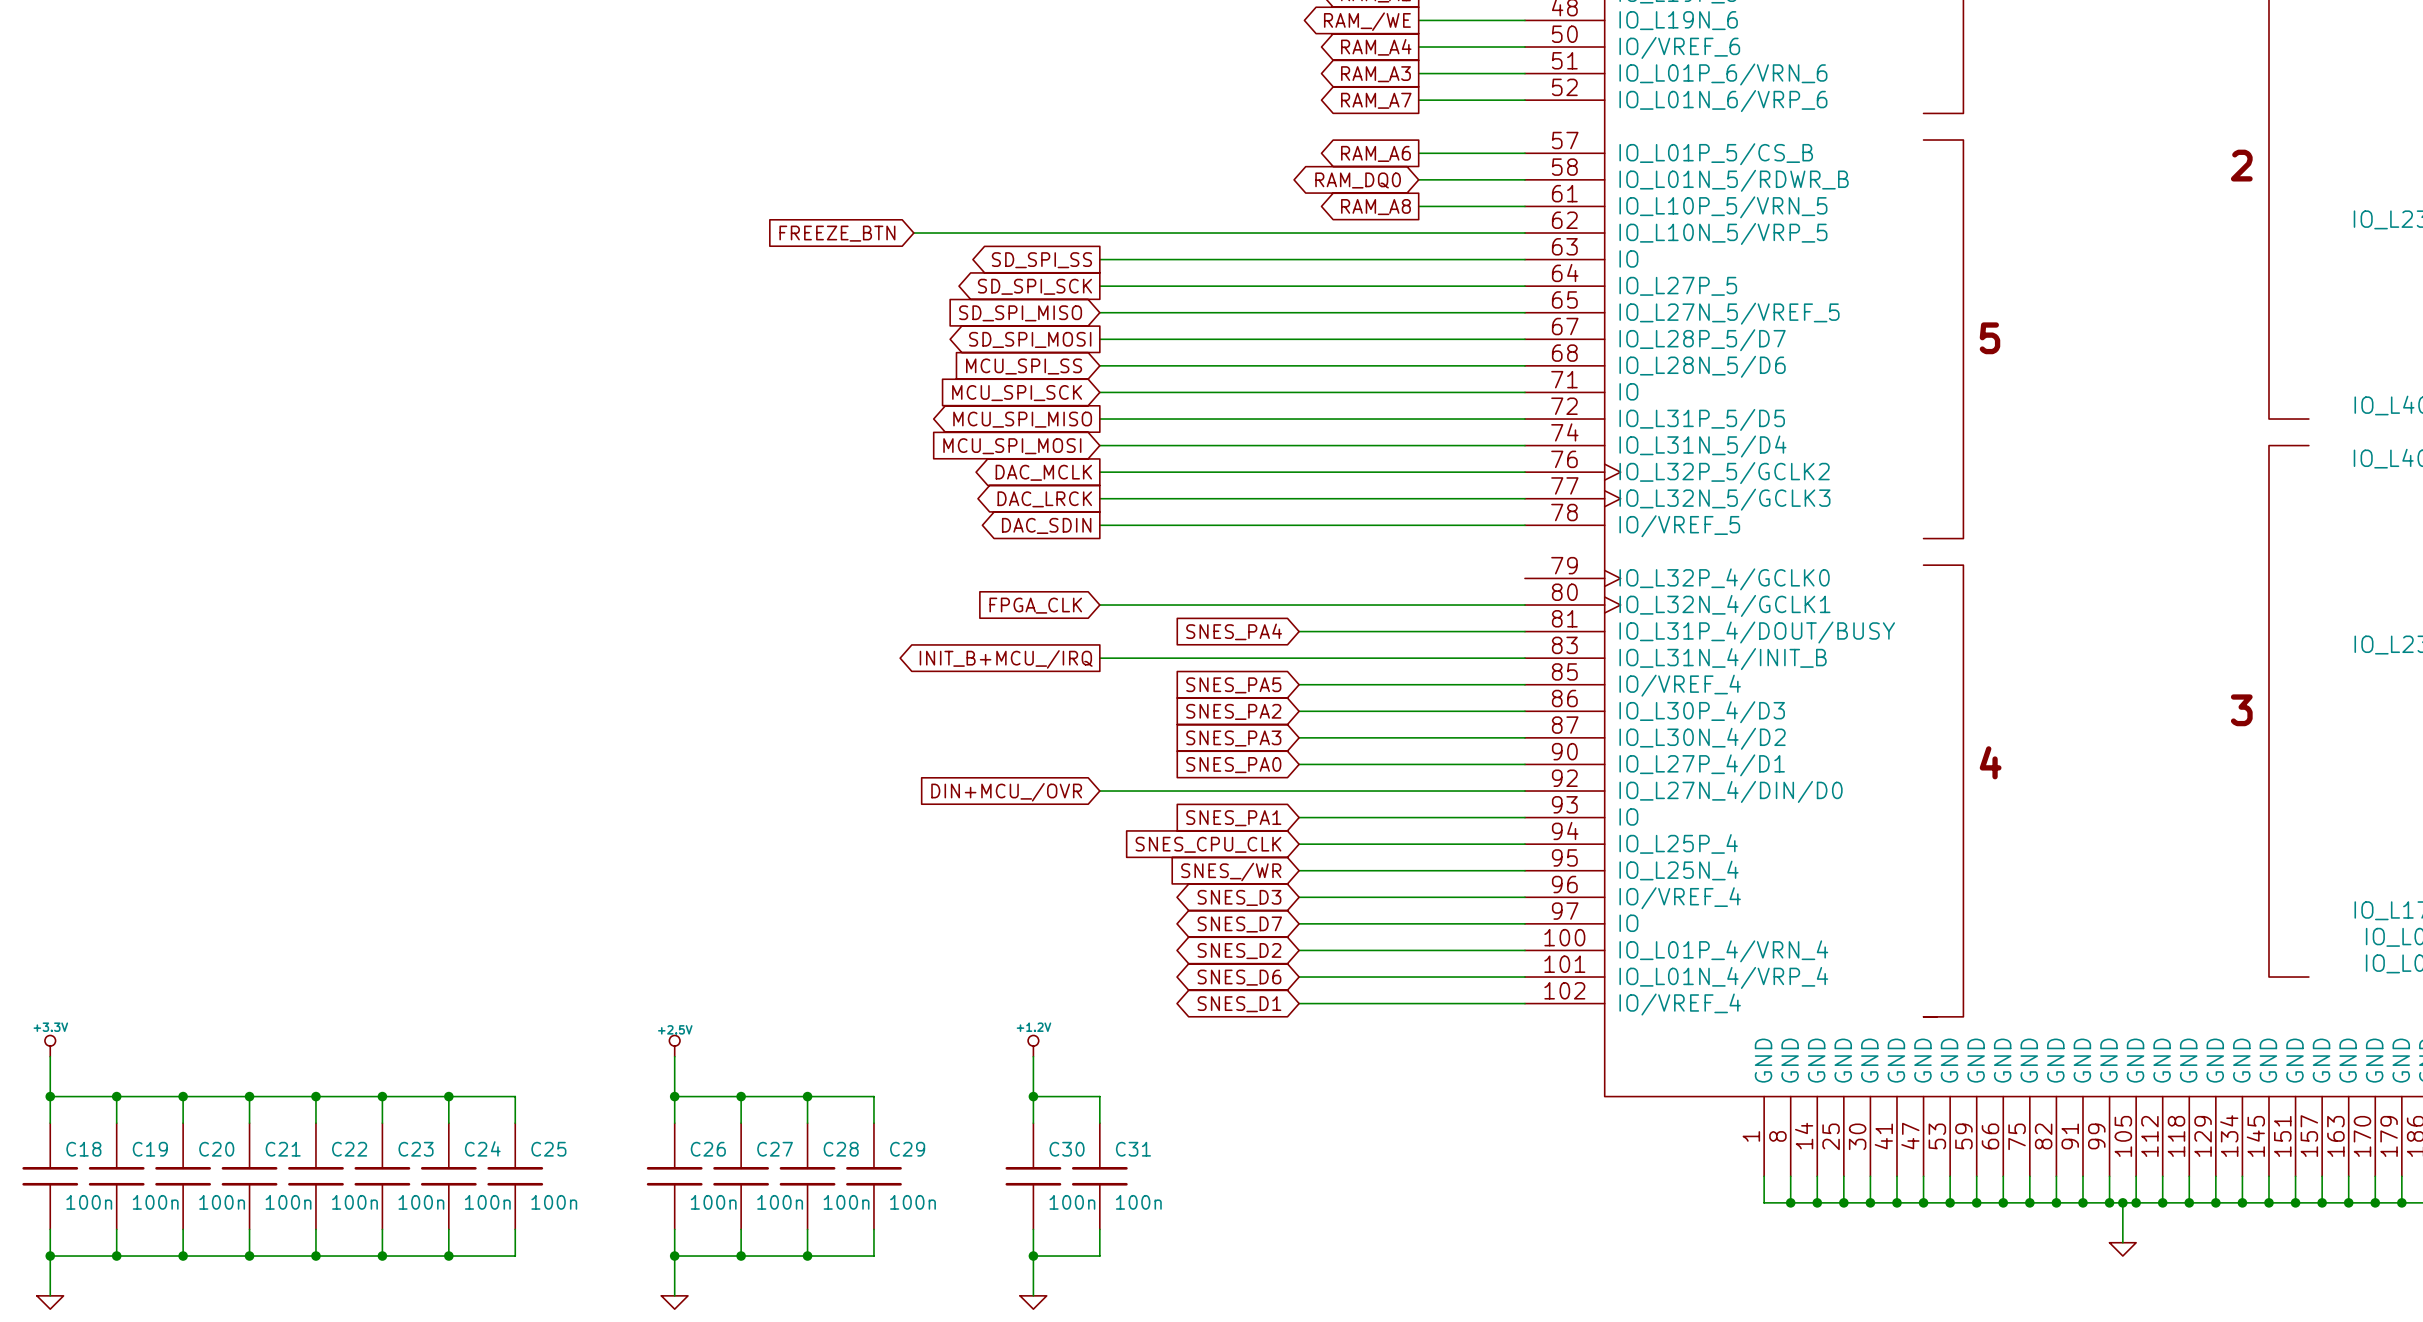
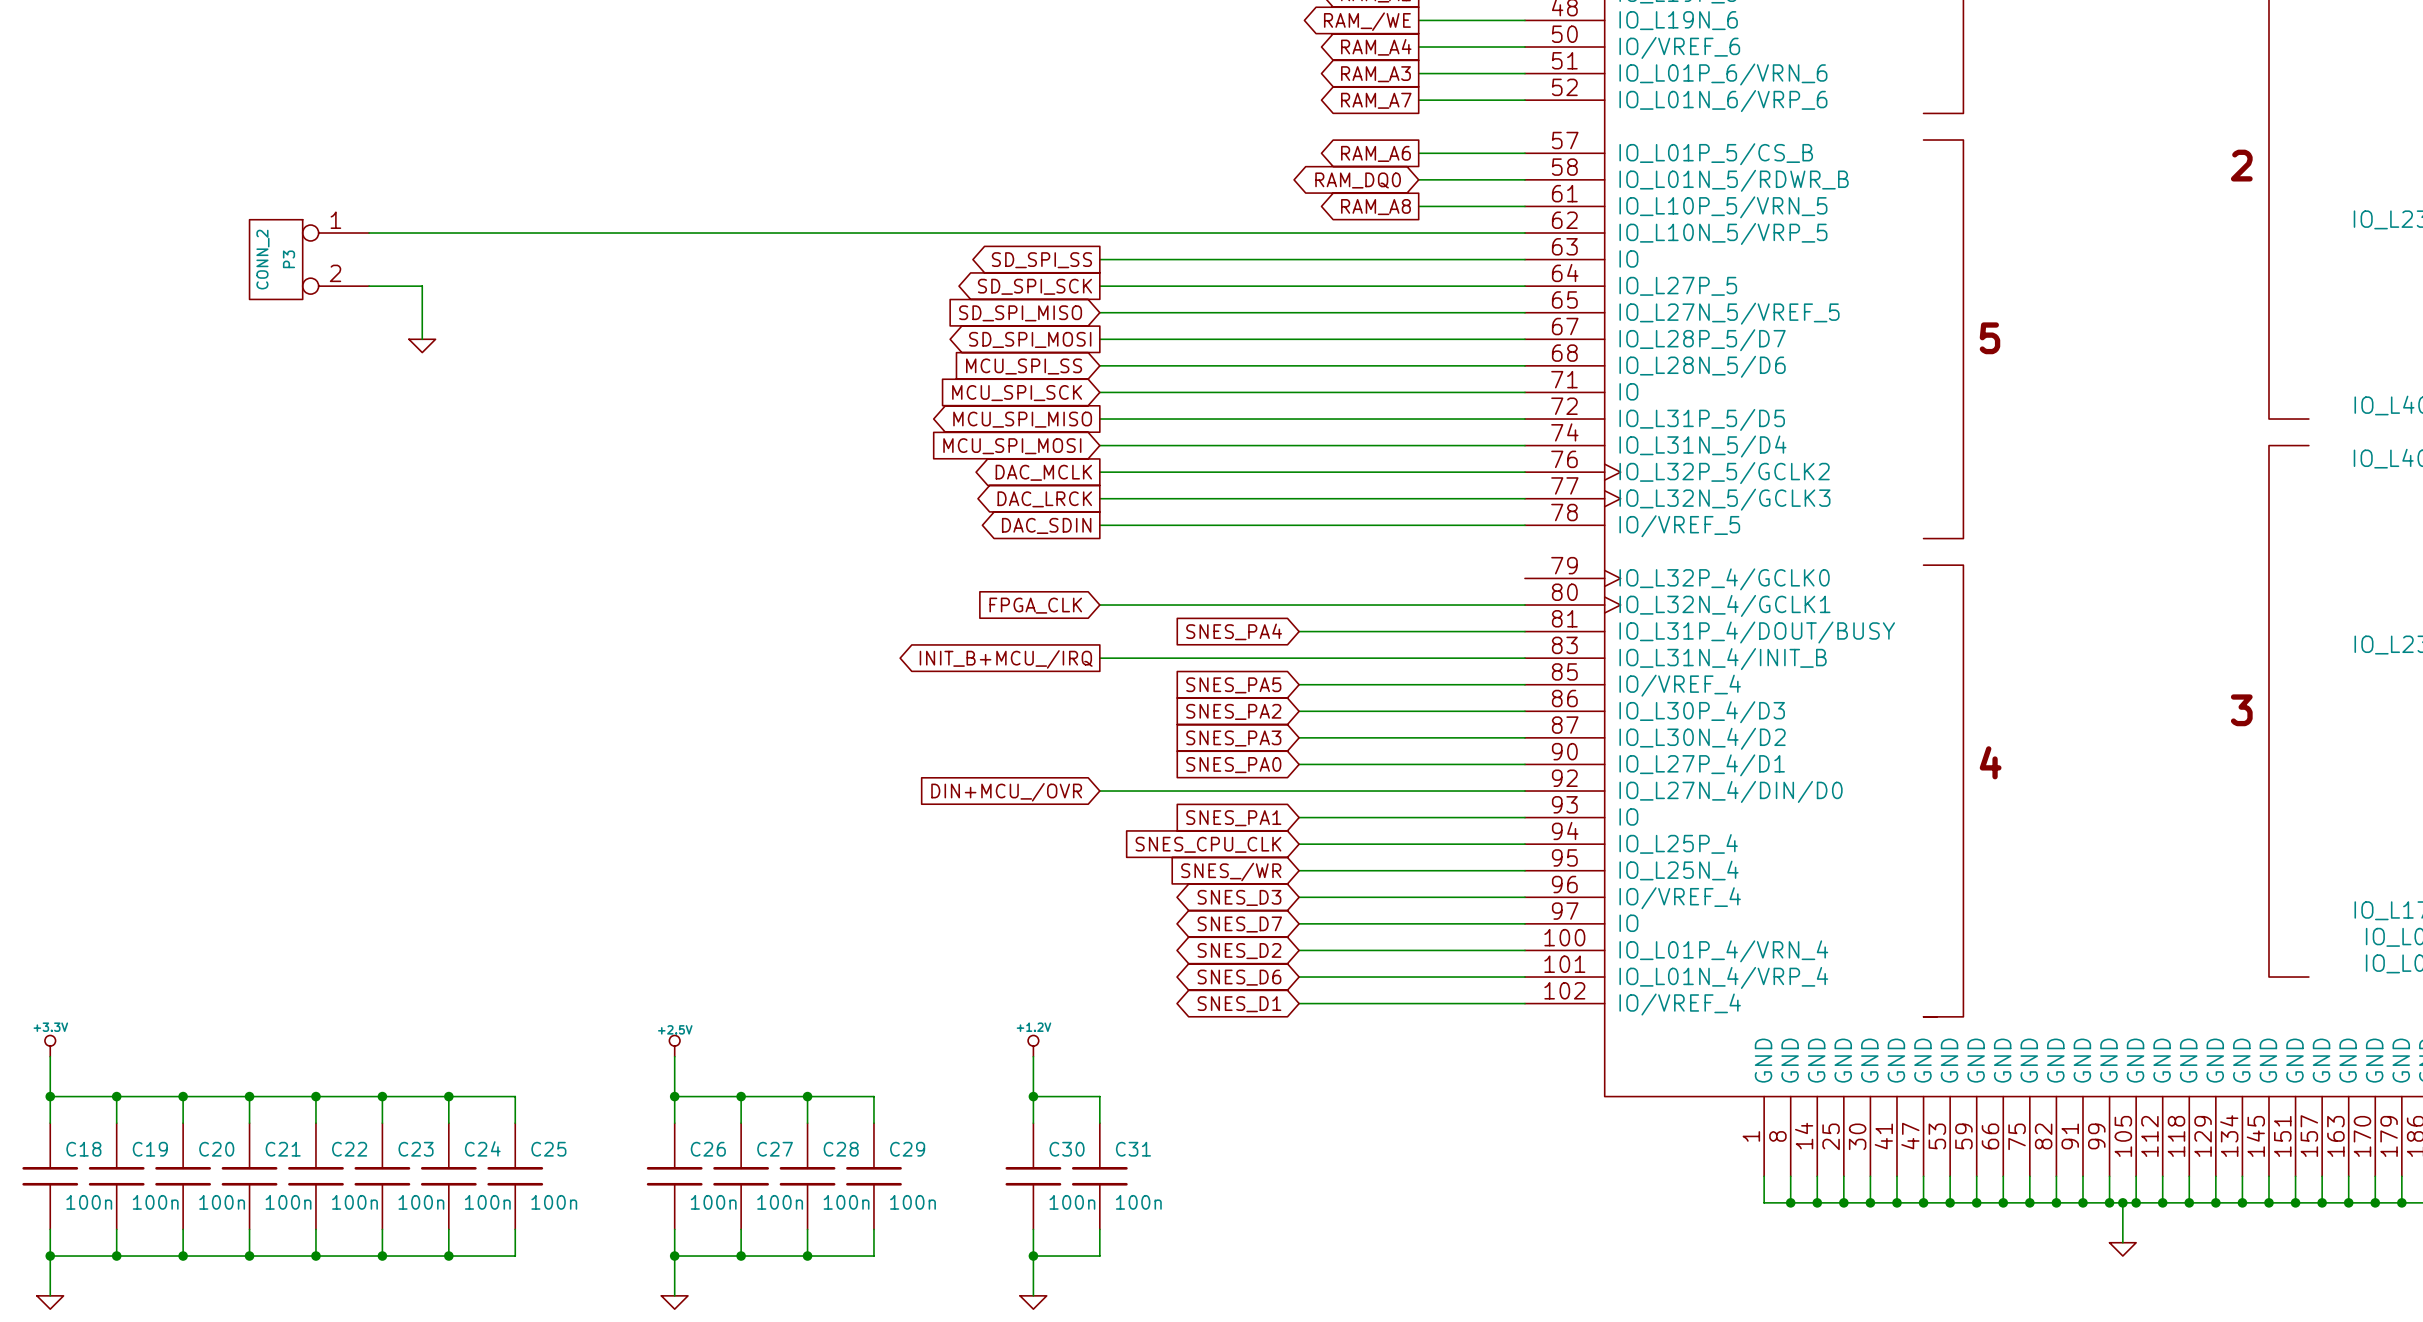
wire: none -> (369, 233) (913, 233)
global label: FREEZE_BTN (837, 233) -> none
P3: none -> CONN_2 (309, 259)
wire: none -> (369, 286) (422, 286) (422, 339)
power symbol: none -> (422, 345)

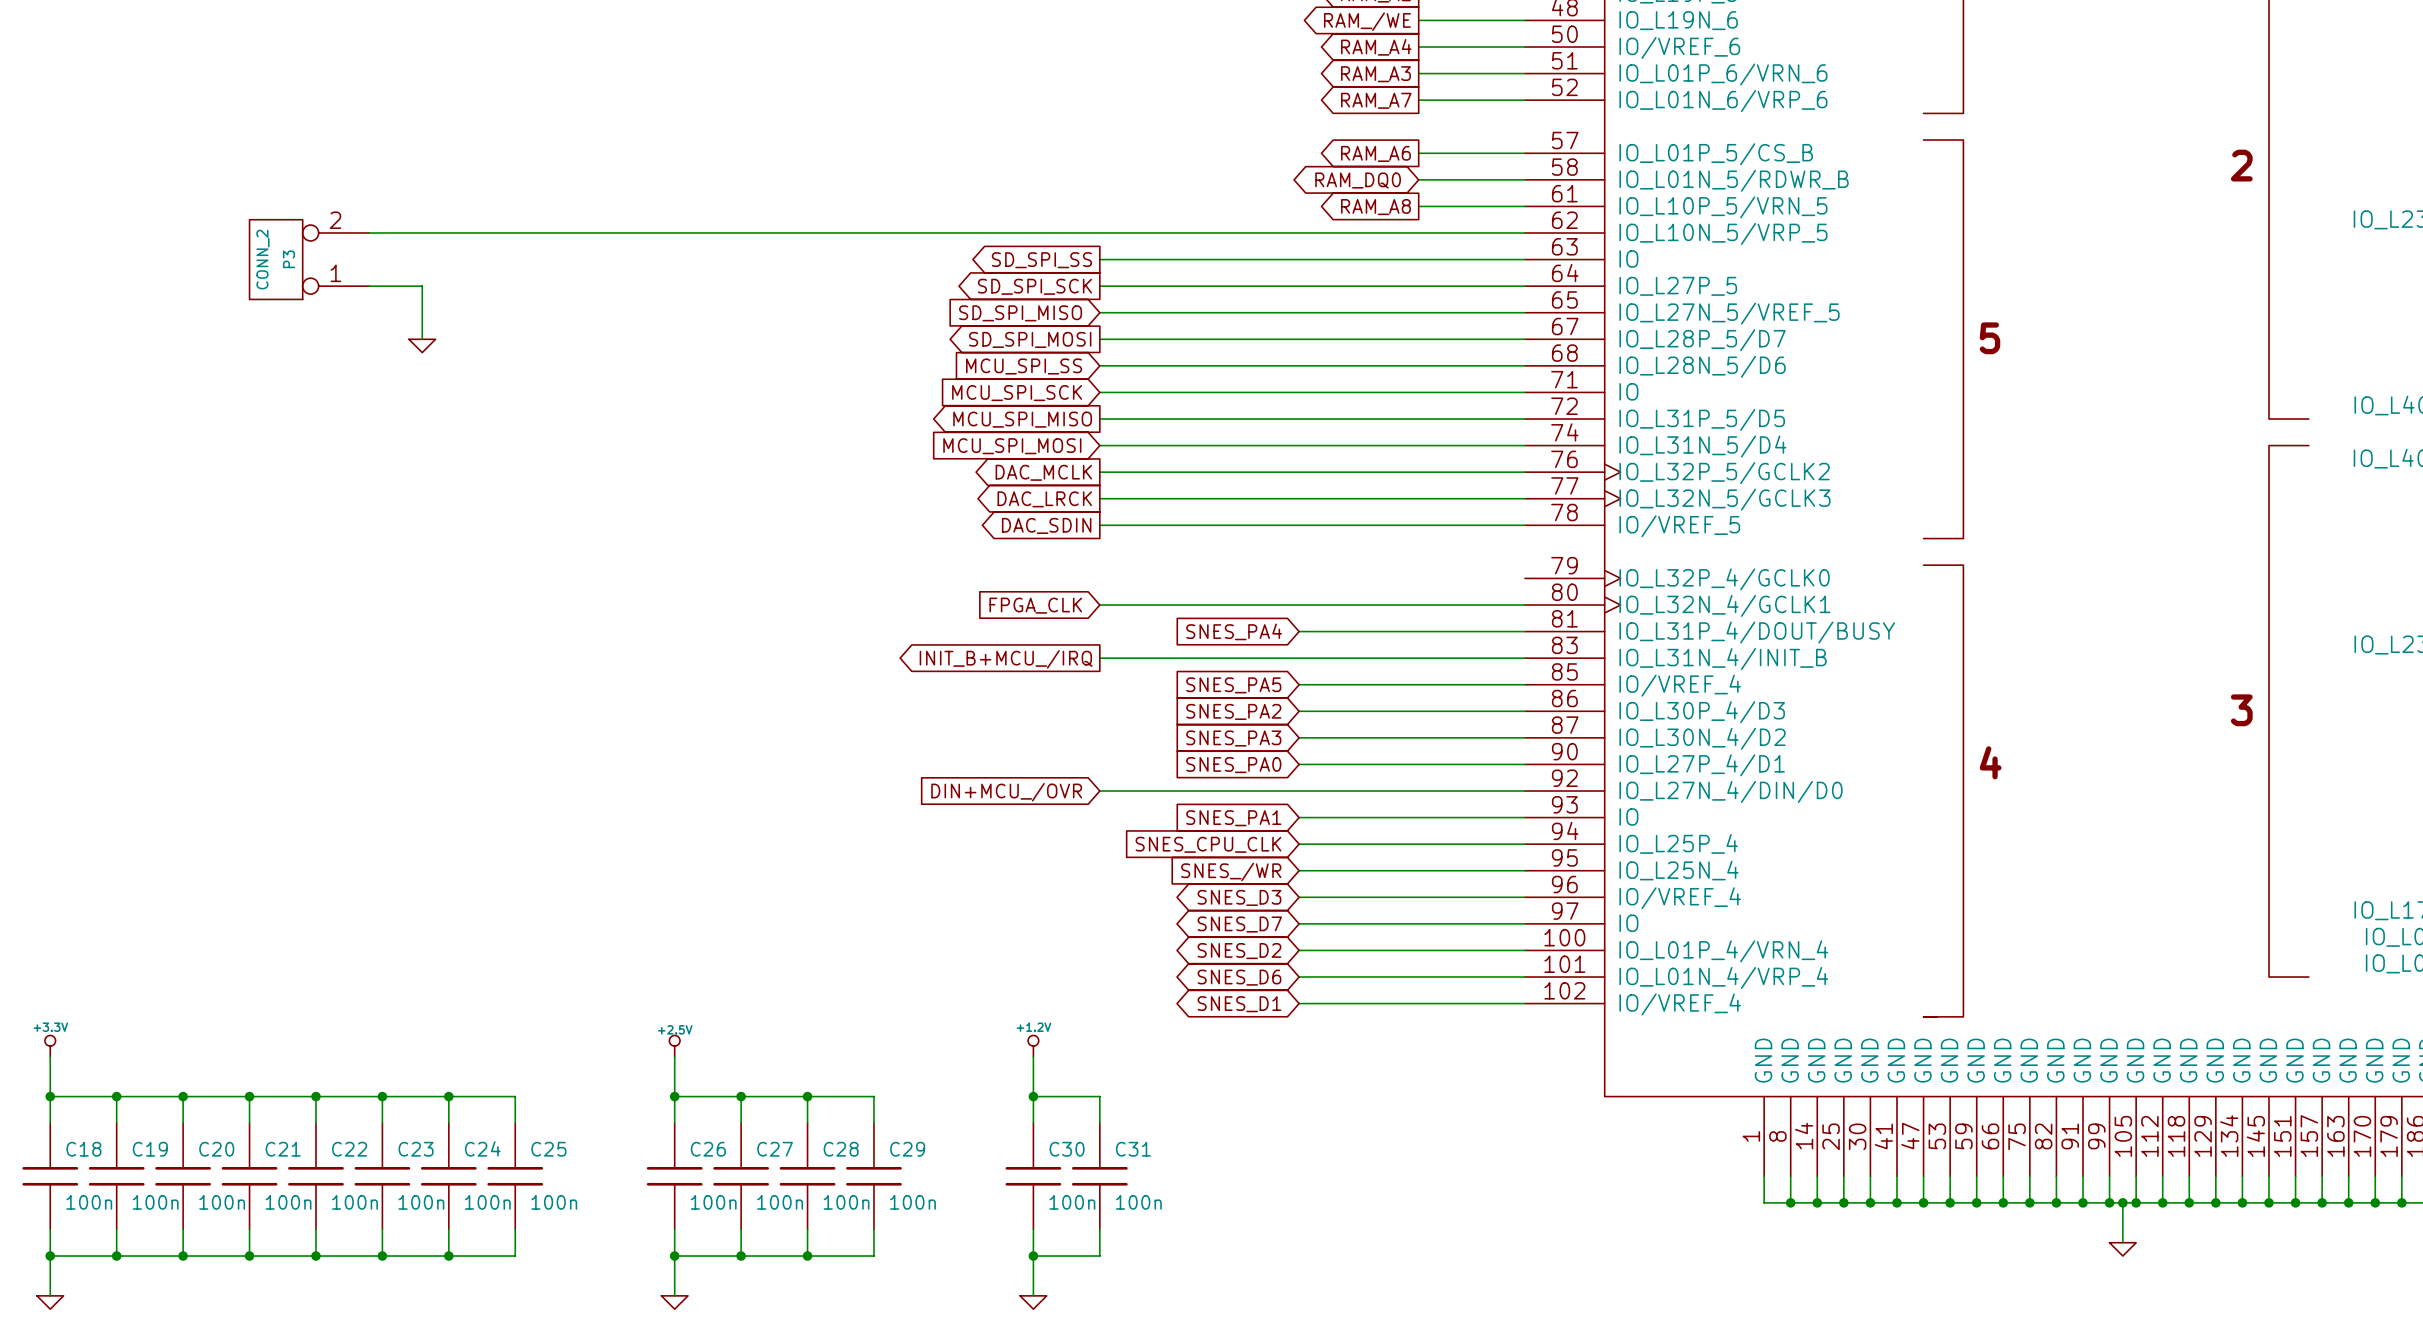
P3 flip: as is (276, 259) -> up-down (276, 259)

